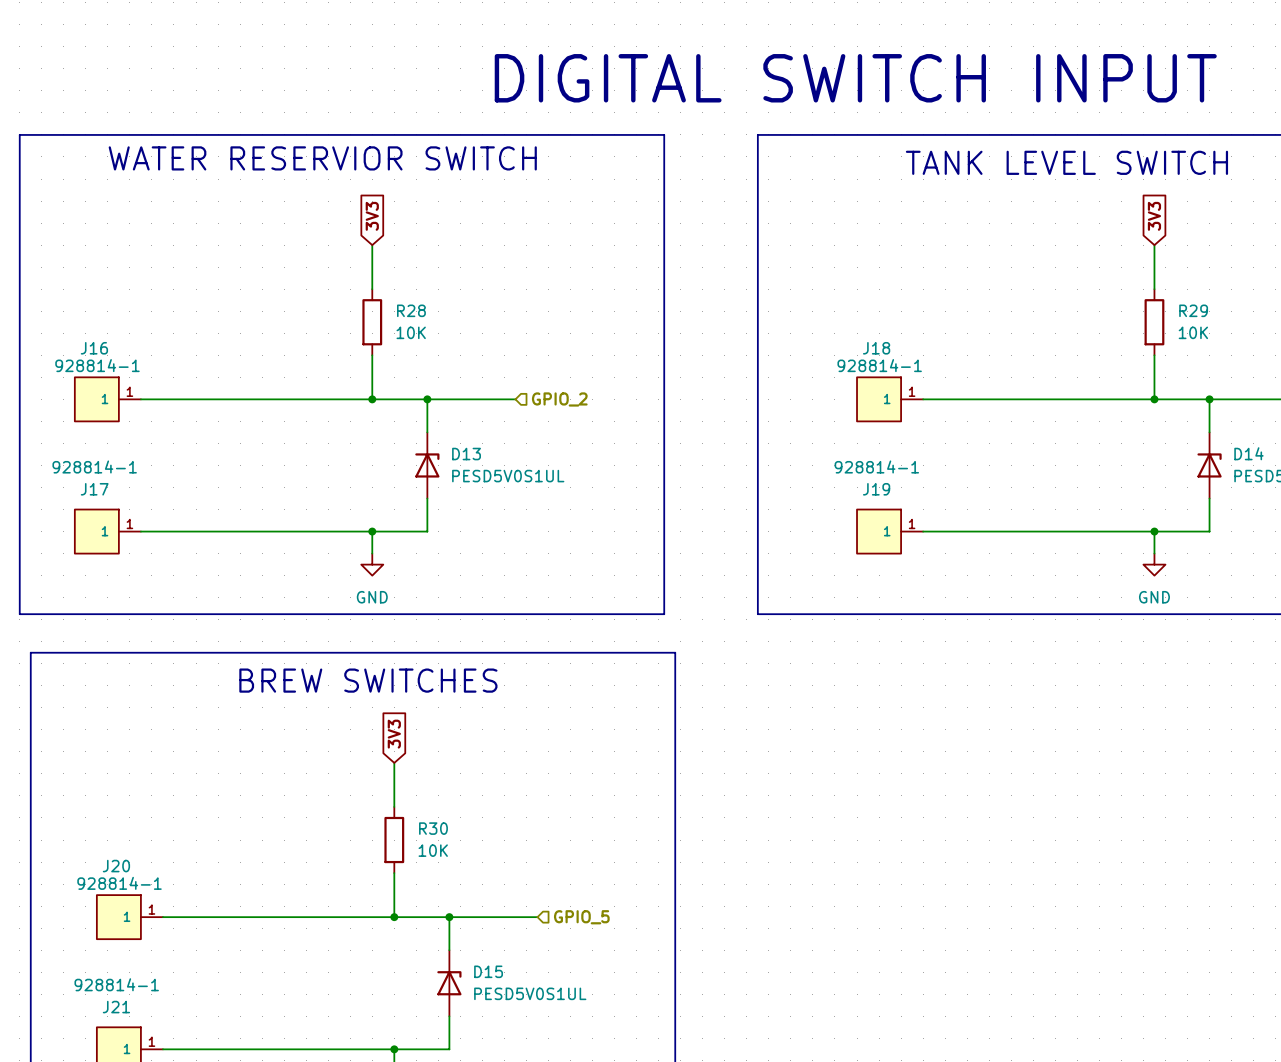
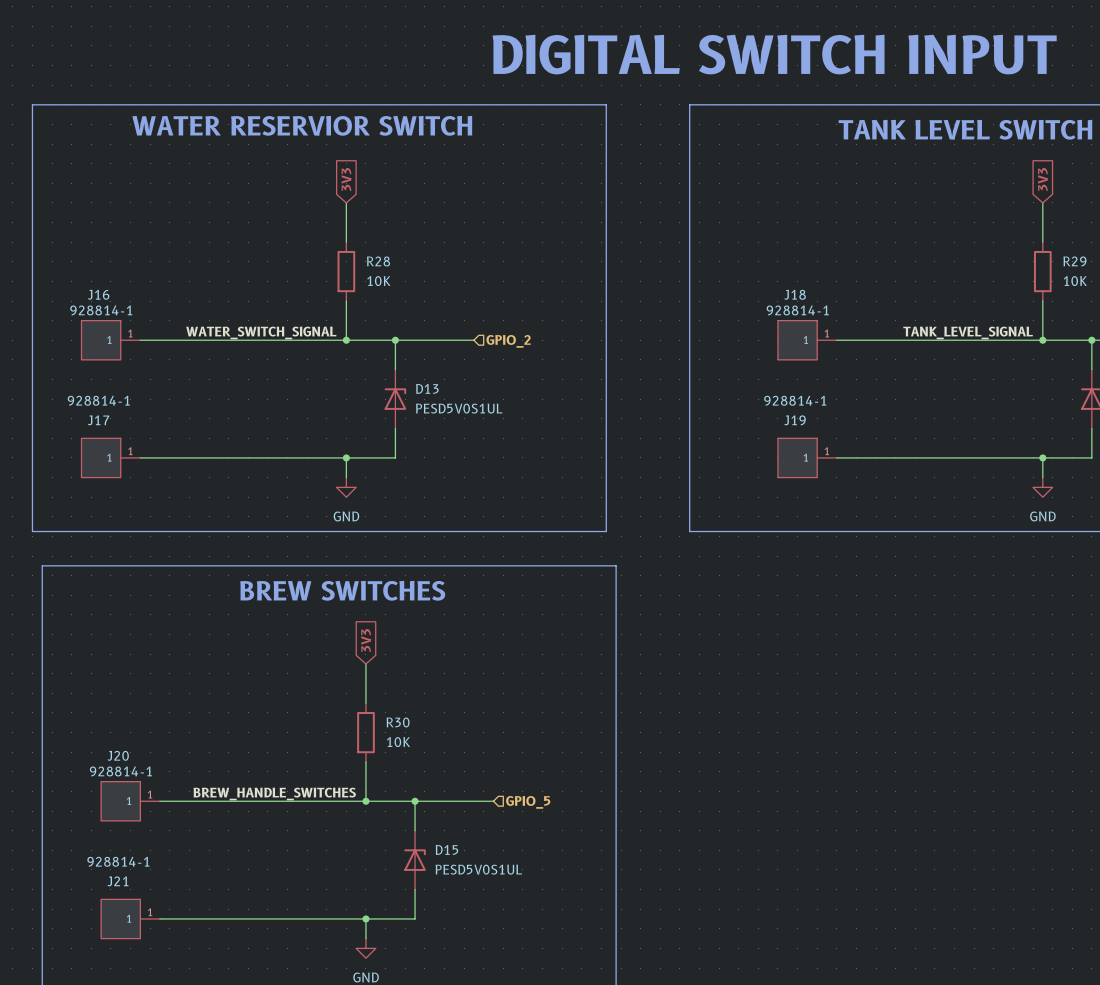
label: none -> WATER_SWITCH_SIGNAL (261, 332)
label: none -> TANK_LEVEL_SIGNAL (968, 332)
label: none -> BREW_HANDLE_SWITCHES (274, 793)

